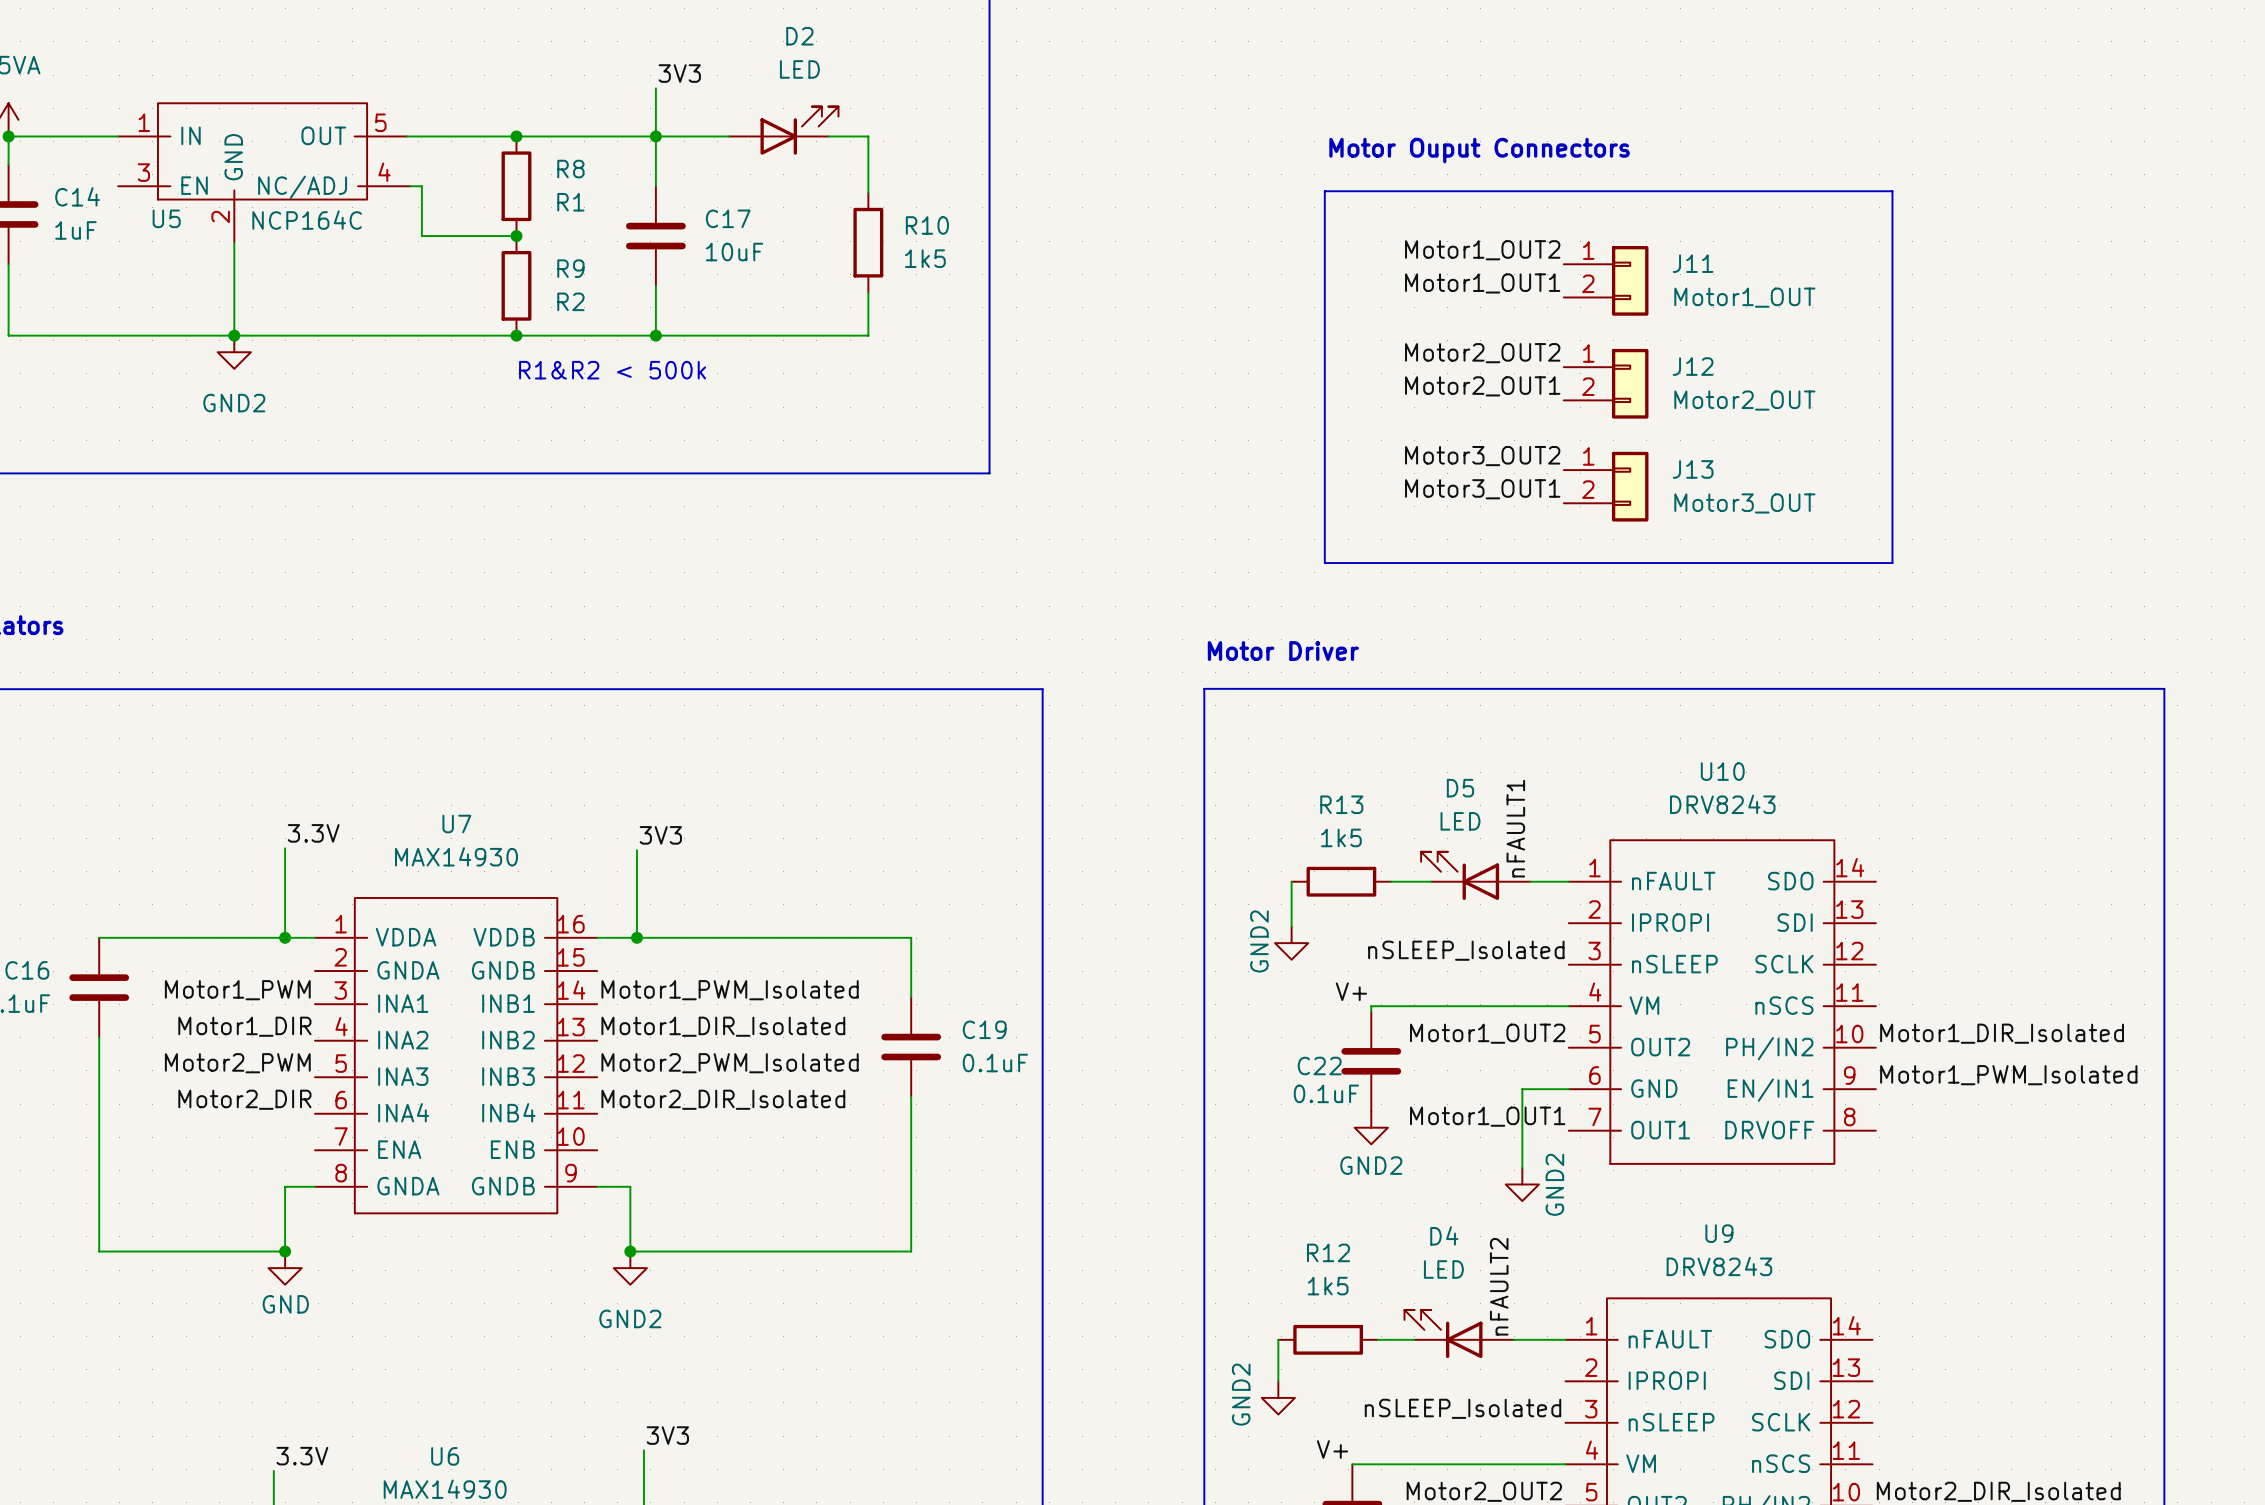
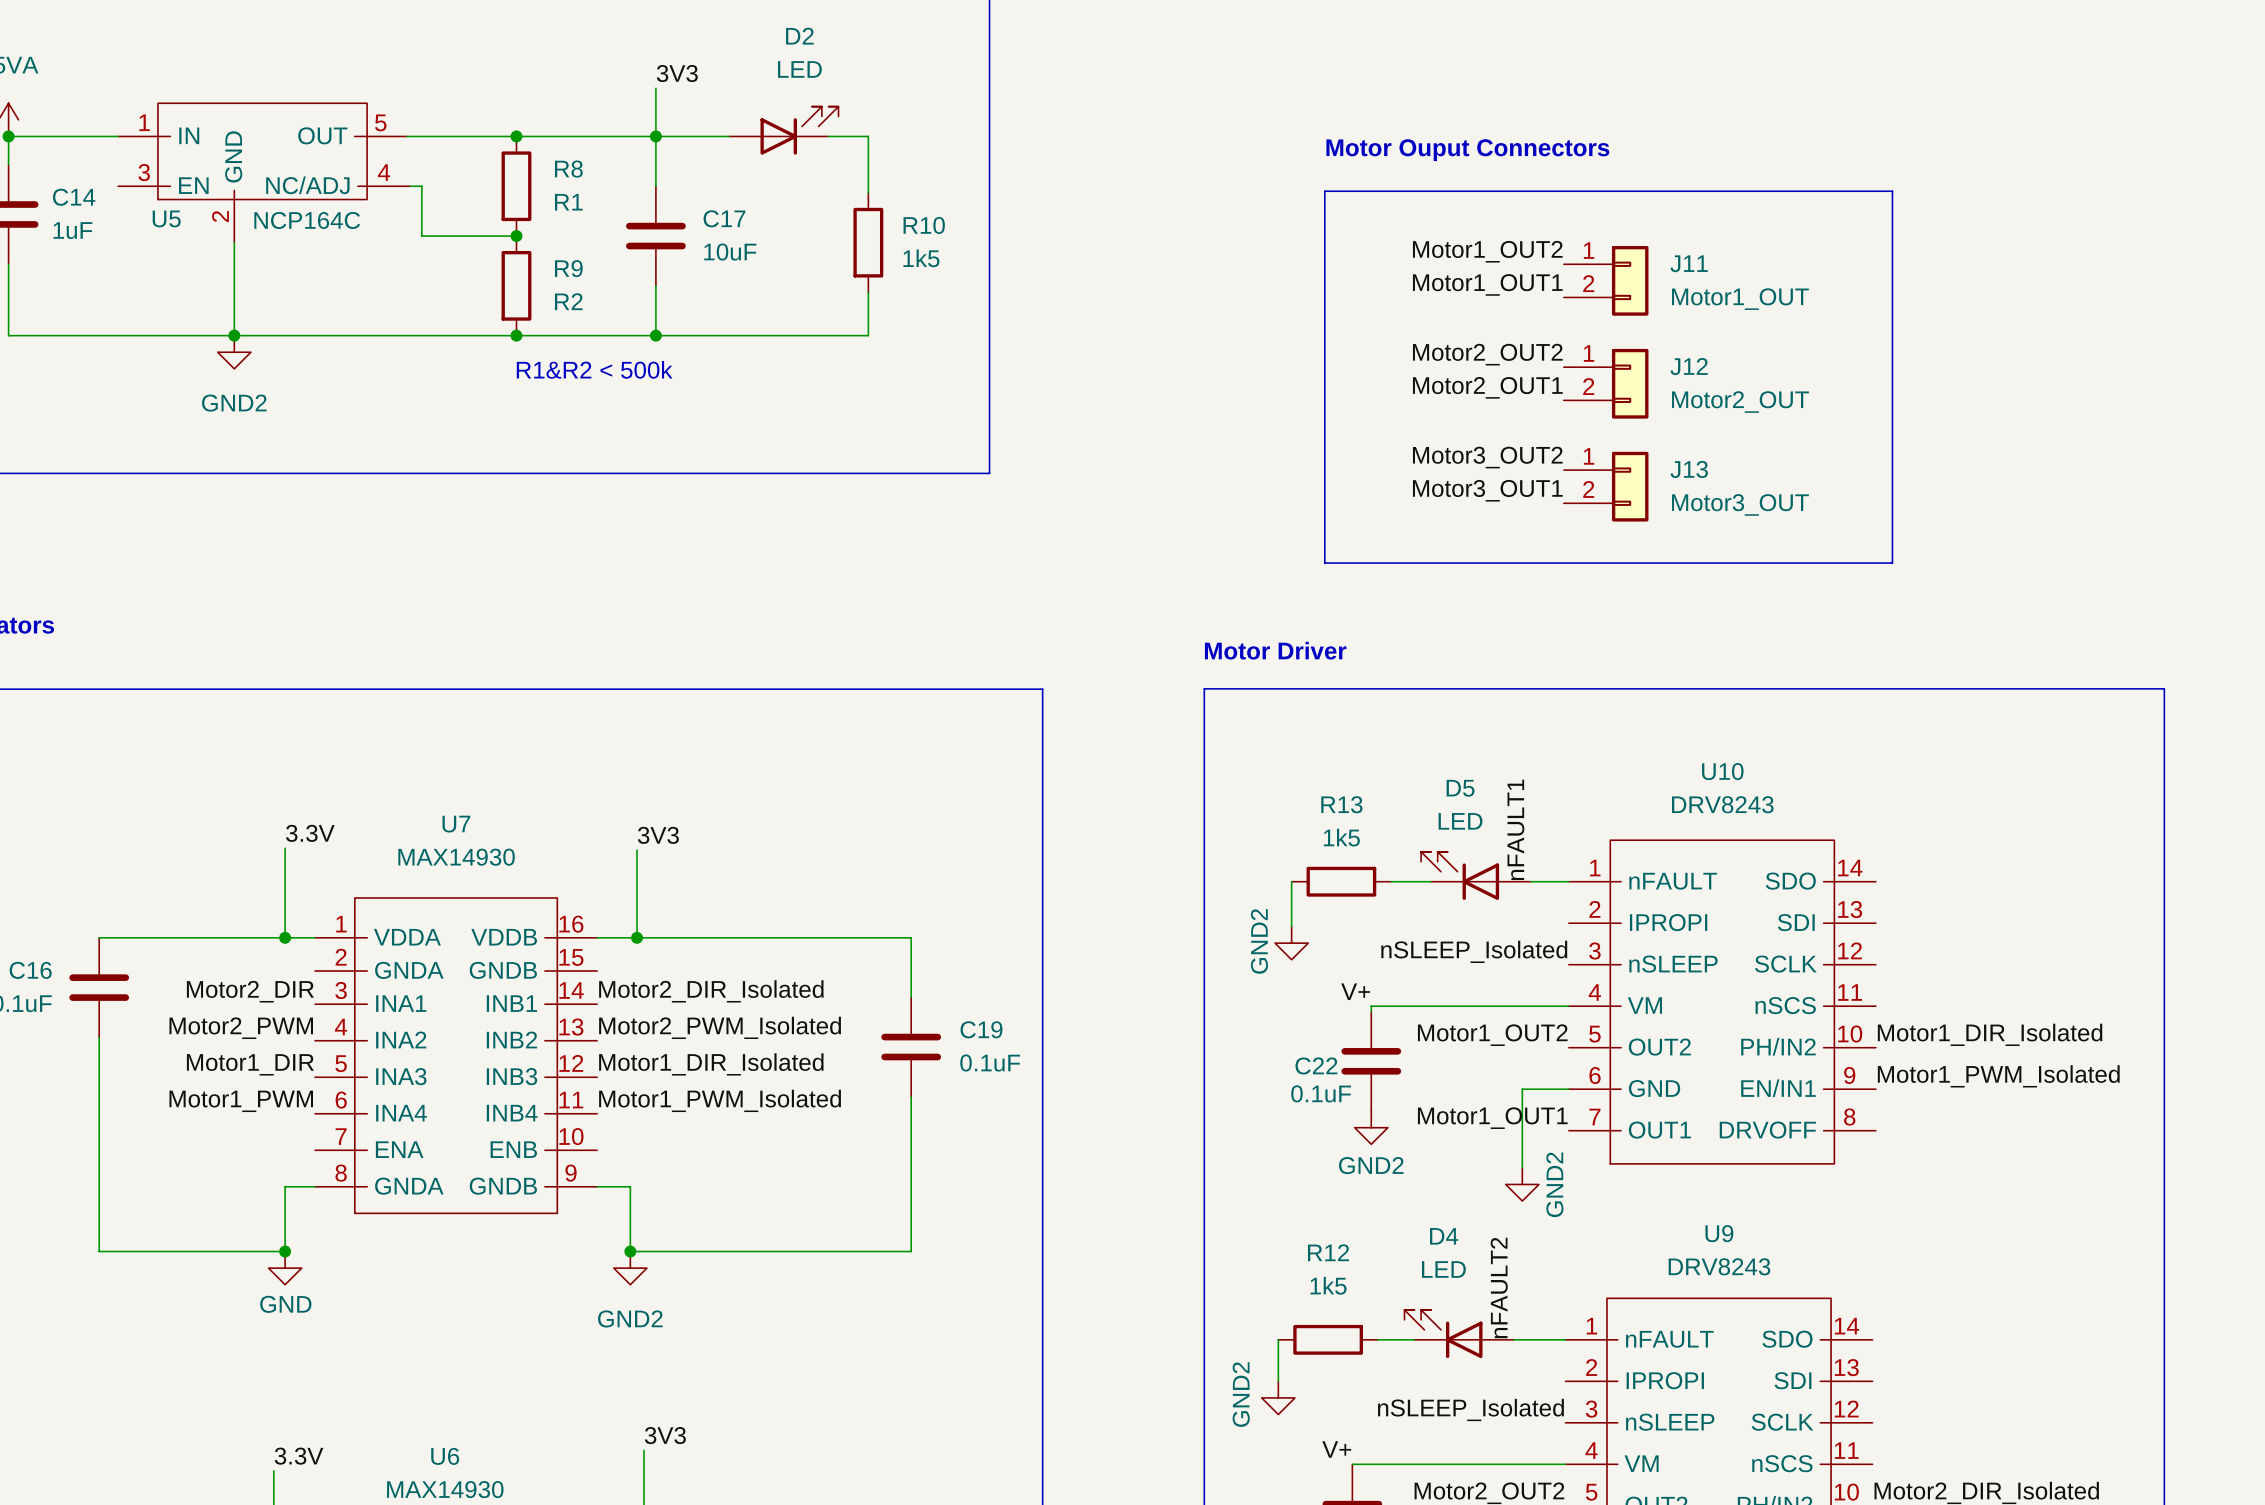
label: Motor1_PWM (237, 990) -> Motor2_DIR (250, 991)
label: Motor1_PWM_Isolated (730, 990) -> Motor2_DIR_Isolated (711, 991)
label: Motor1_DIR (244, 1026) -> Motor2_PWM (241, 1028)
label: Motor1_DIR_Isolated (723, 1026) -> Motor2_PWM_Isolated (720, 1027)
label: Motor2_PWM (237, 1063) -> Motor1_DIR (250, 1064)
label: Motor2_PWM_Isolated (730, 1063) -> Motor1_DIR_Isolated (711, 1064)
label: Motor2_DIR (244, 1099) -> Motor1_PWM (241, 1101)
label: Motor2_DIR_Isolated (723, 1099) -> Motor1_PWM_Isolated (720, 1100)

